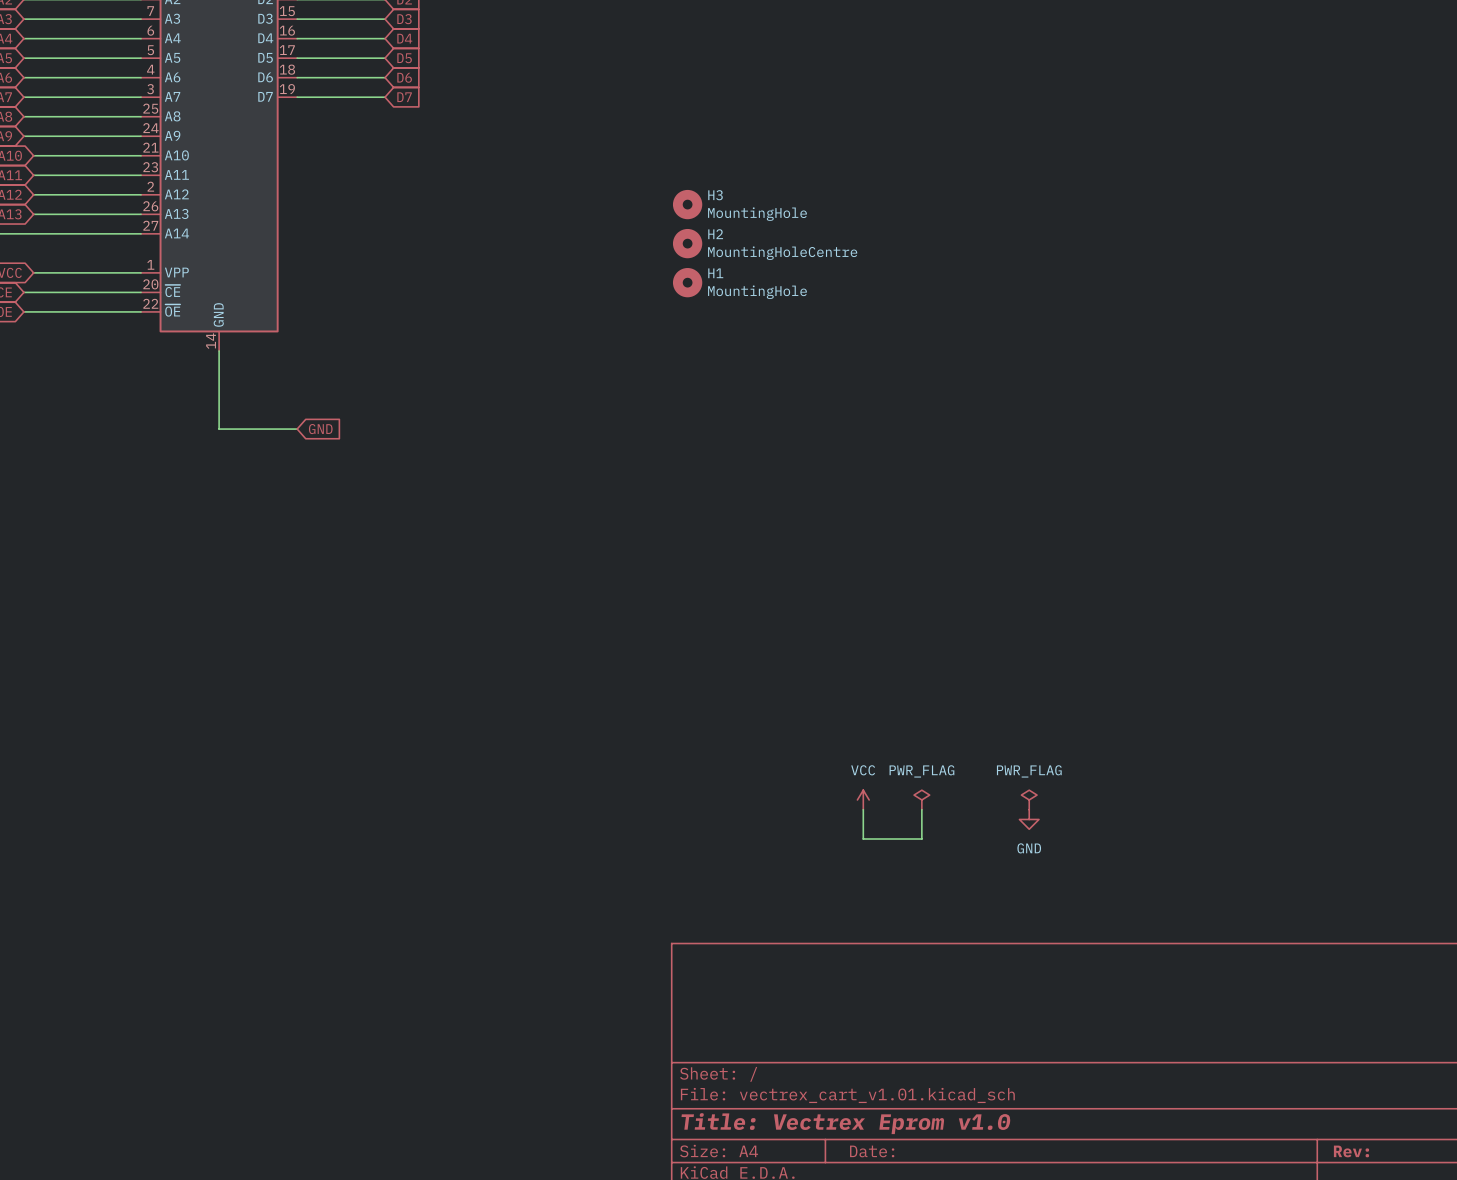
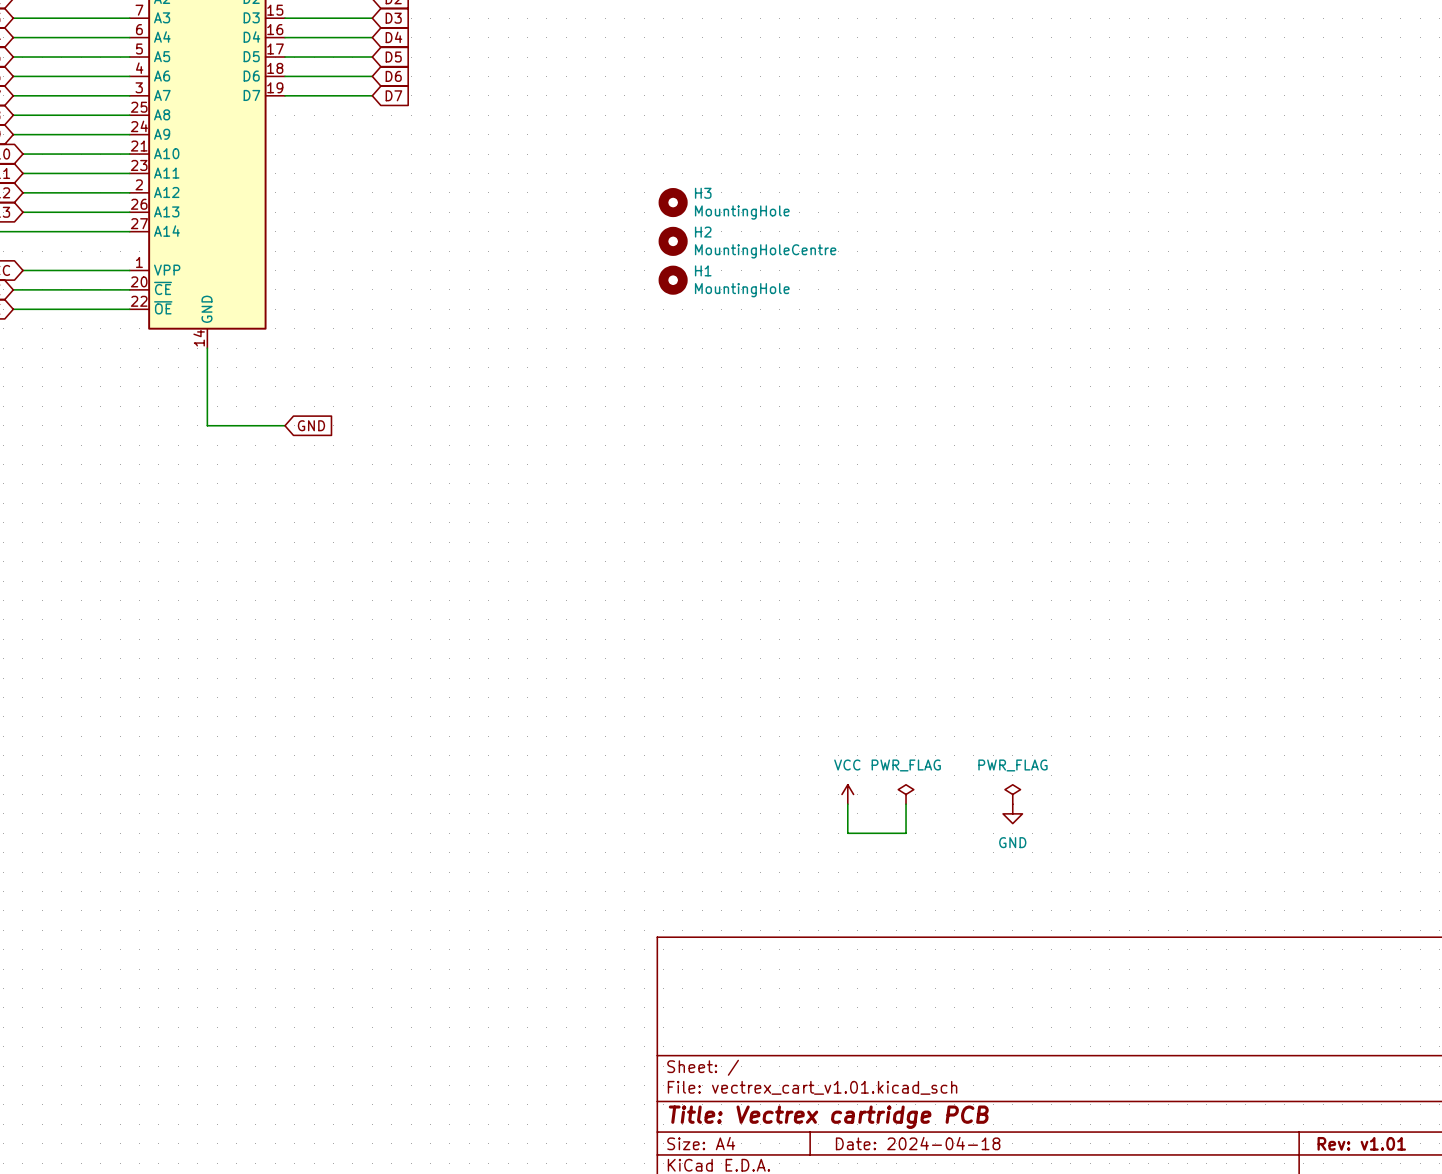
title block: Title: Vectrex Eprom v1.0 (846, 1123) -> Title: Vectrex cartridge PCB (828, 1117)
title block: Date: (872, 1151) -> Date: 2024-04-18 (918, 1143)
title block: Rev: (1351, 1151) -> Rev: v1.01 (1361, 1143)

